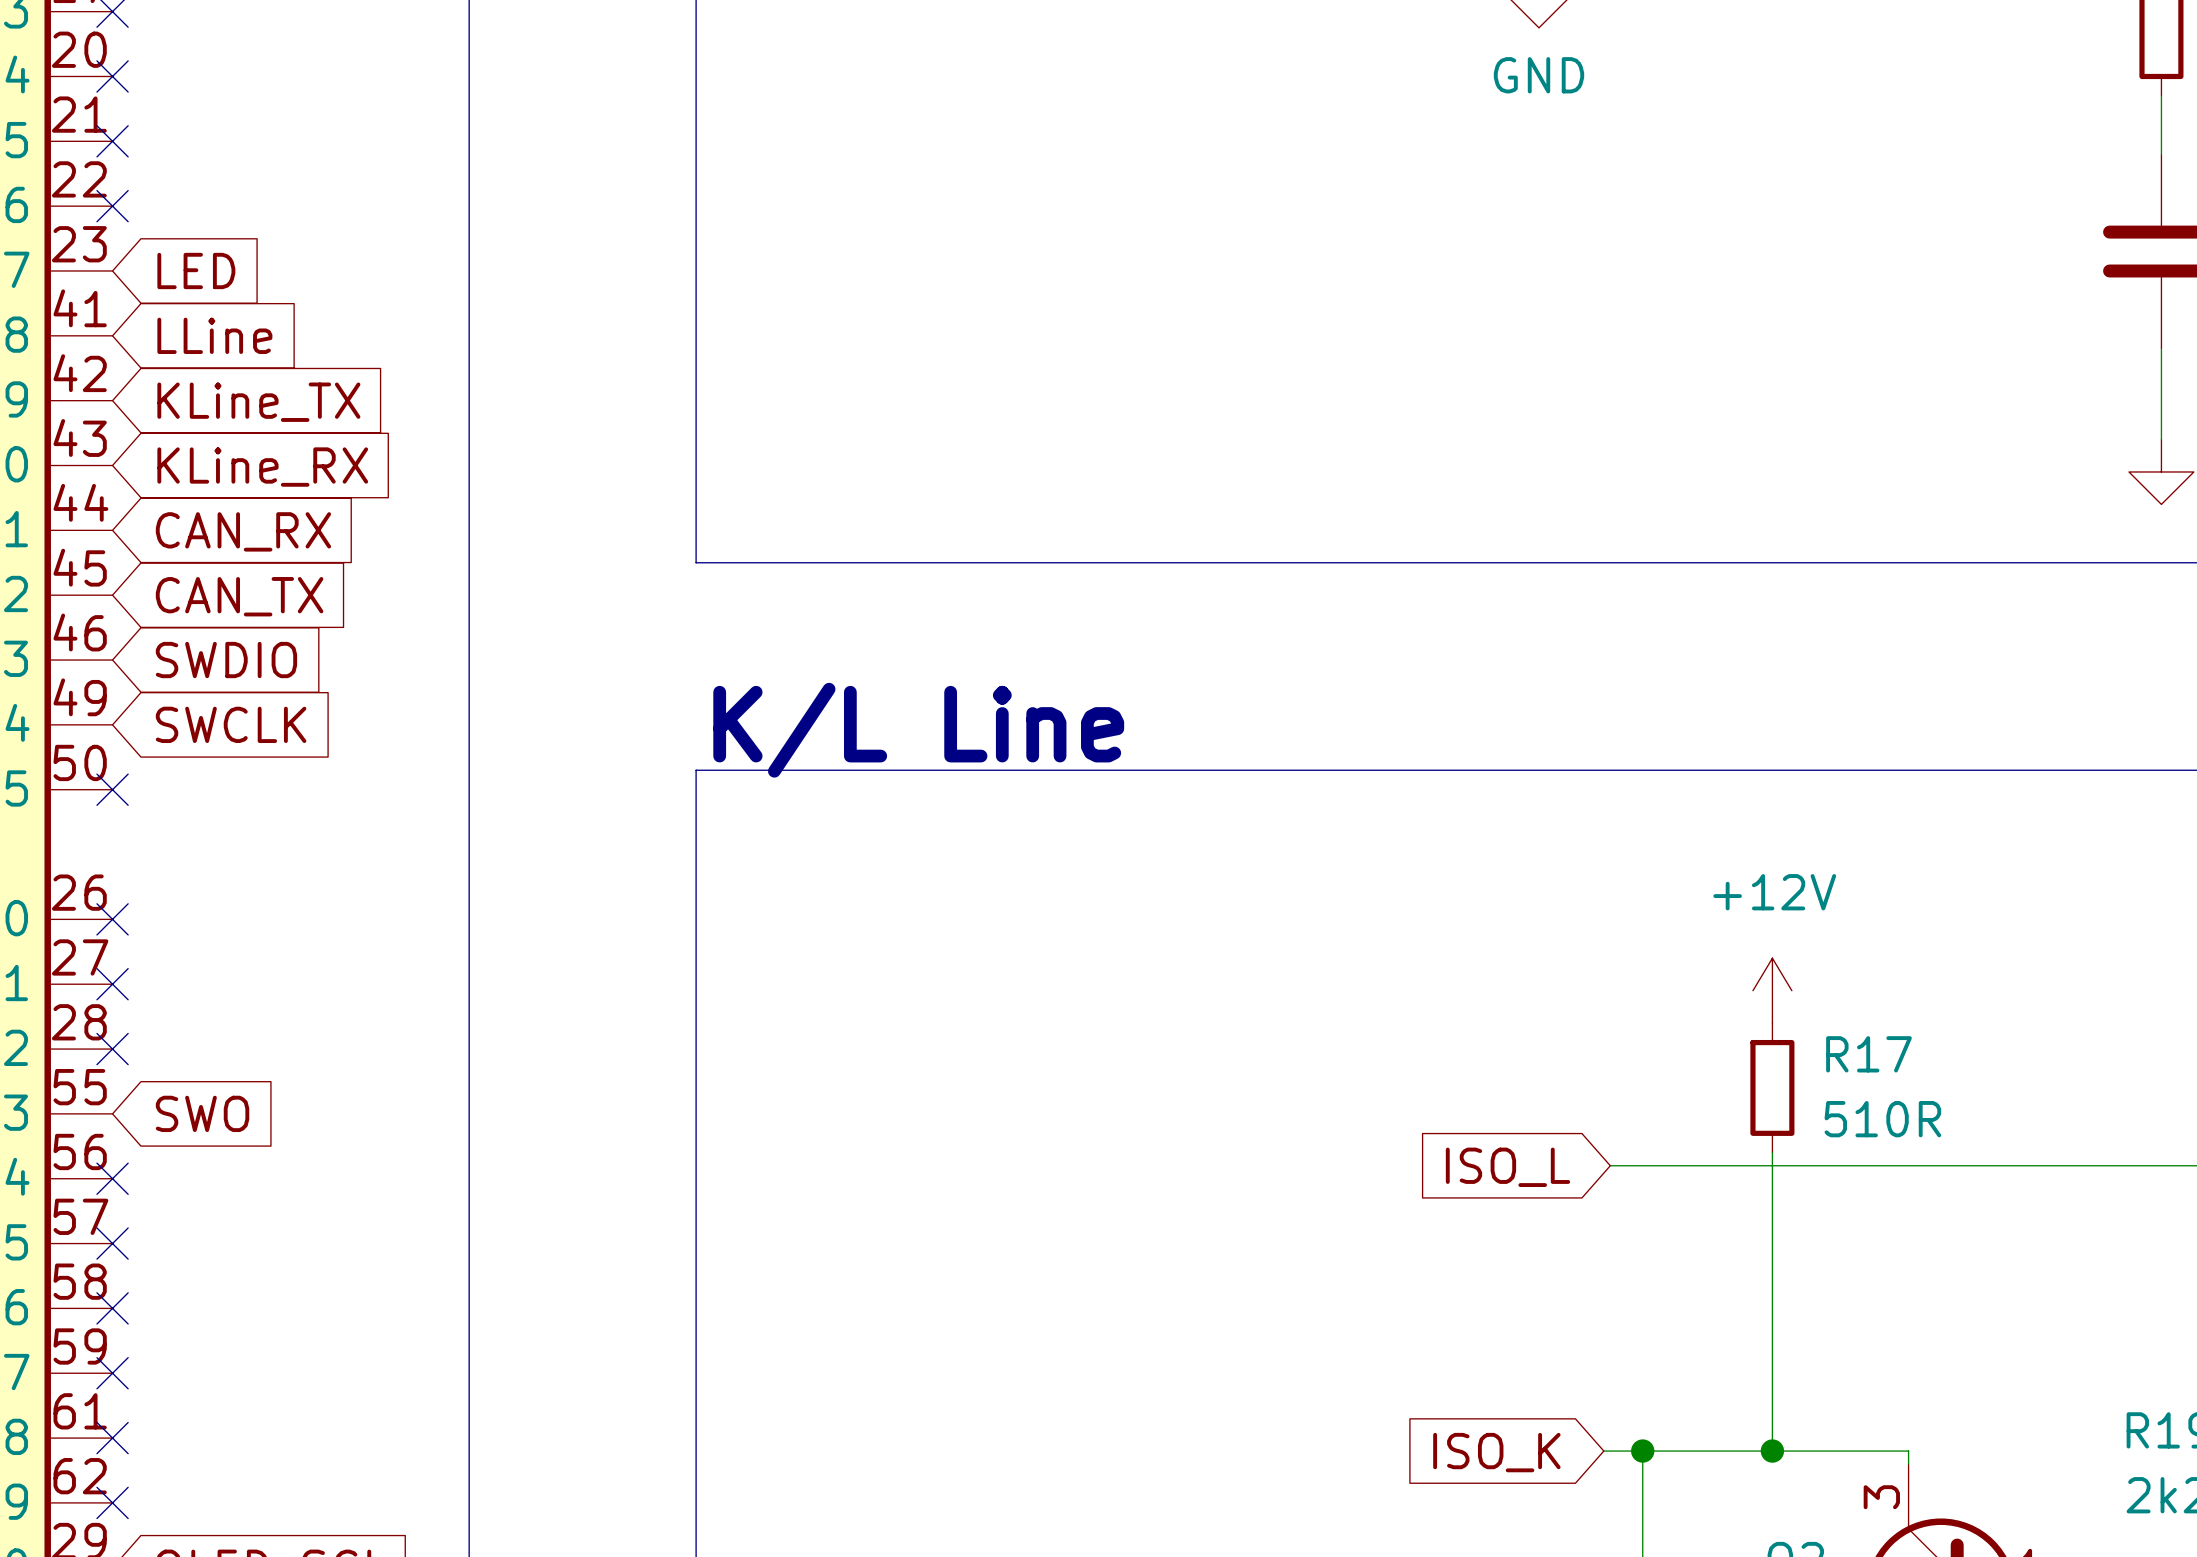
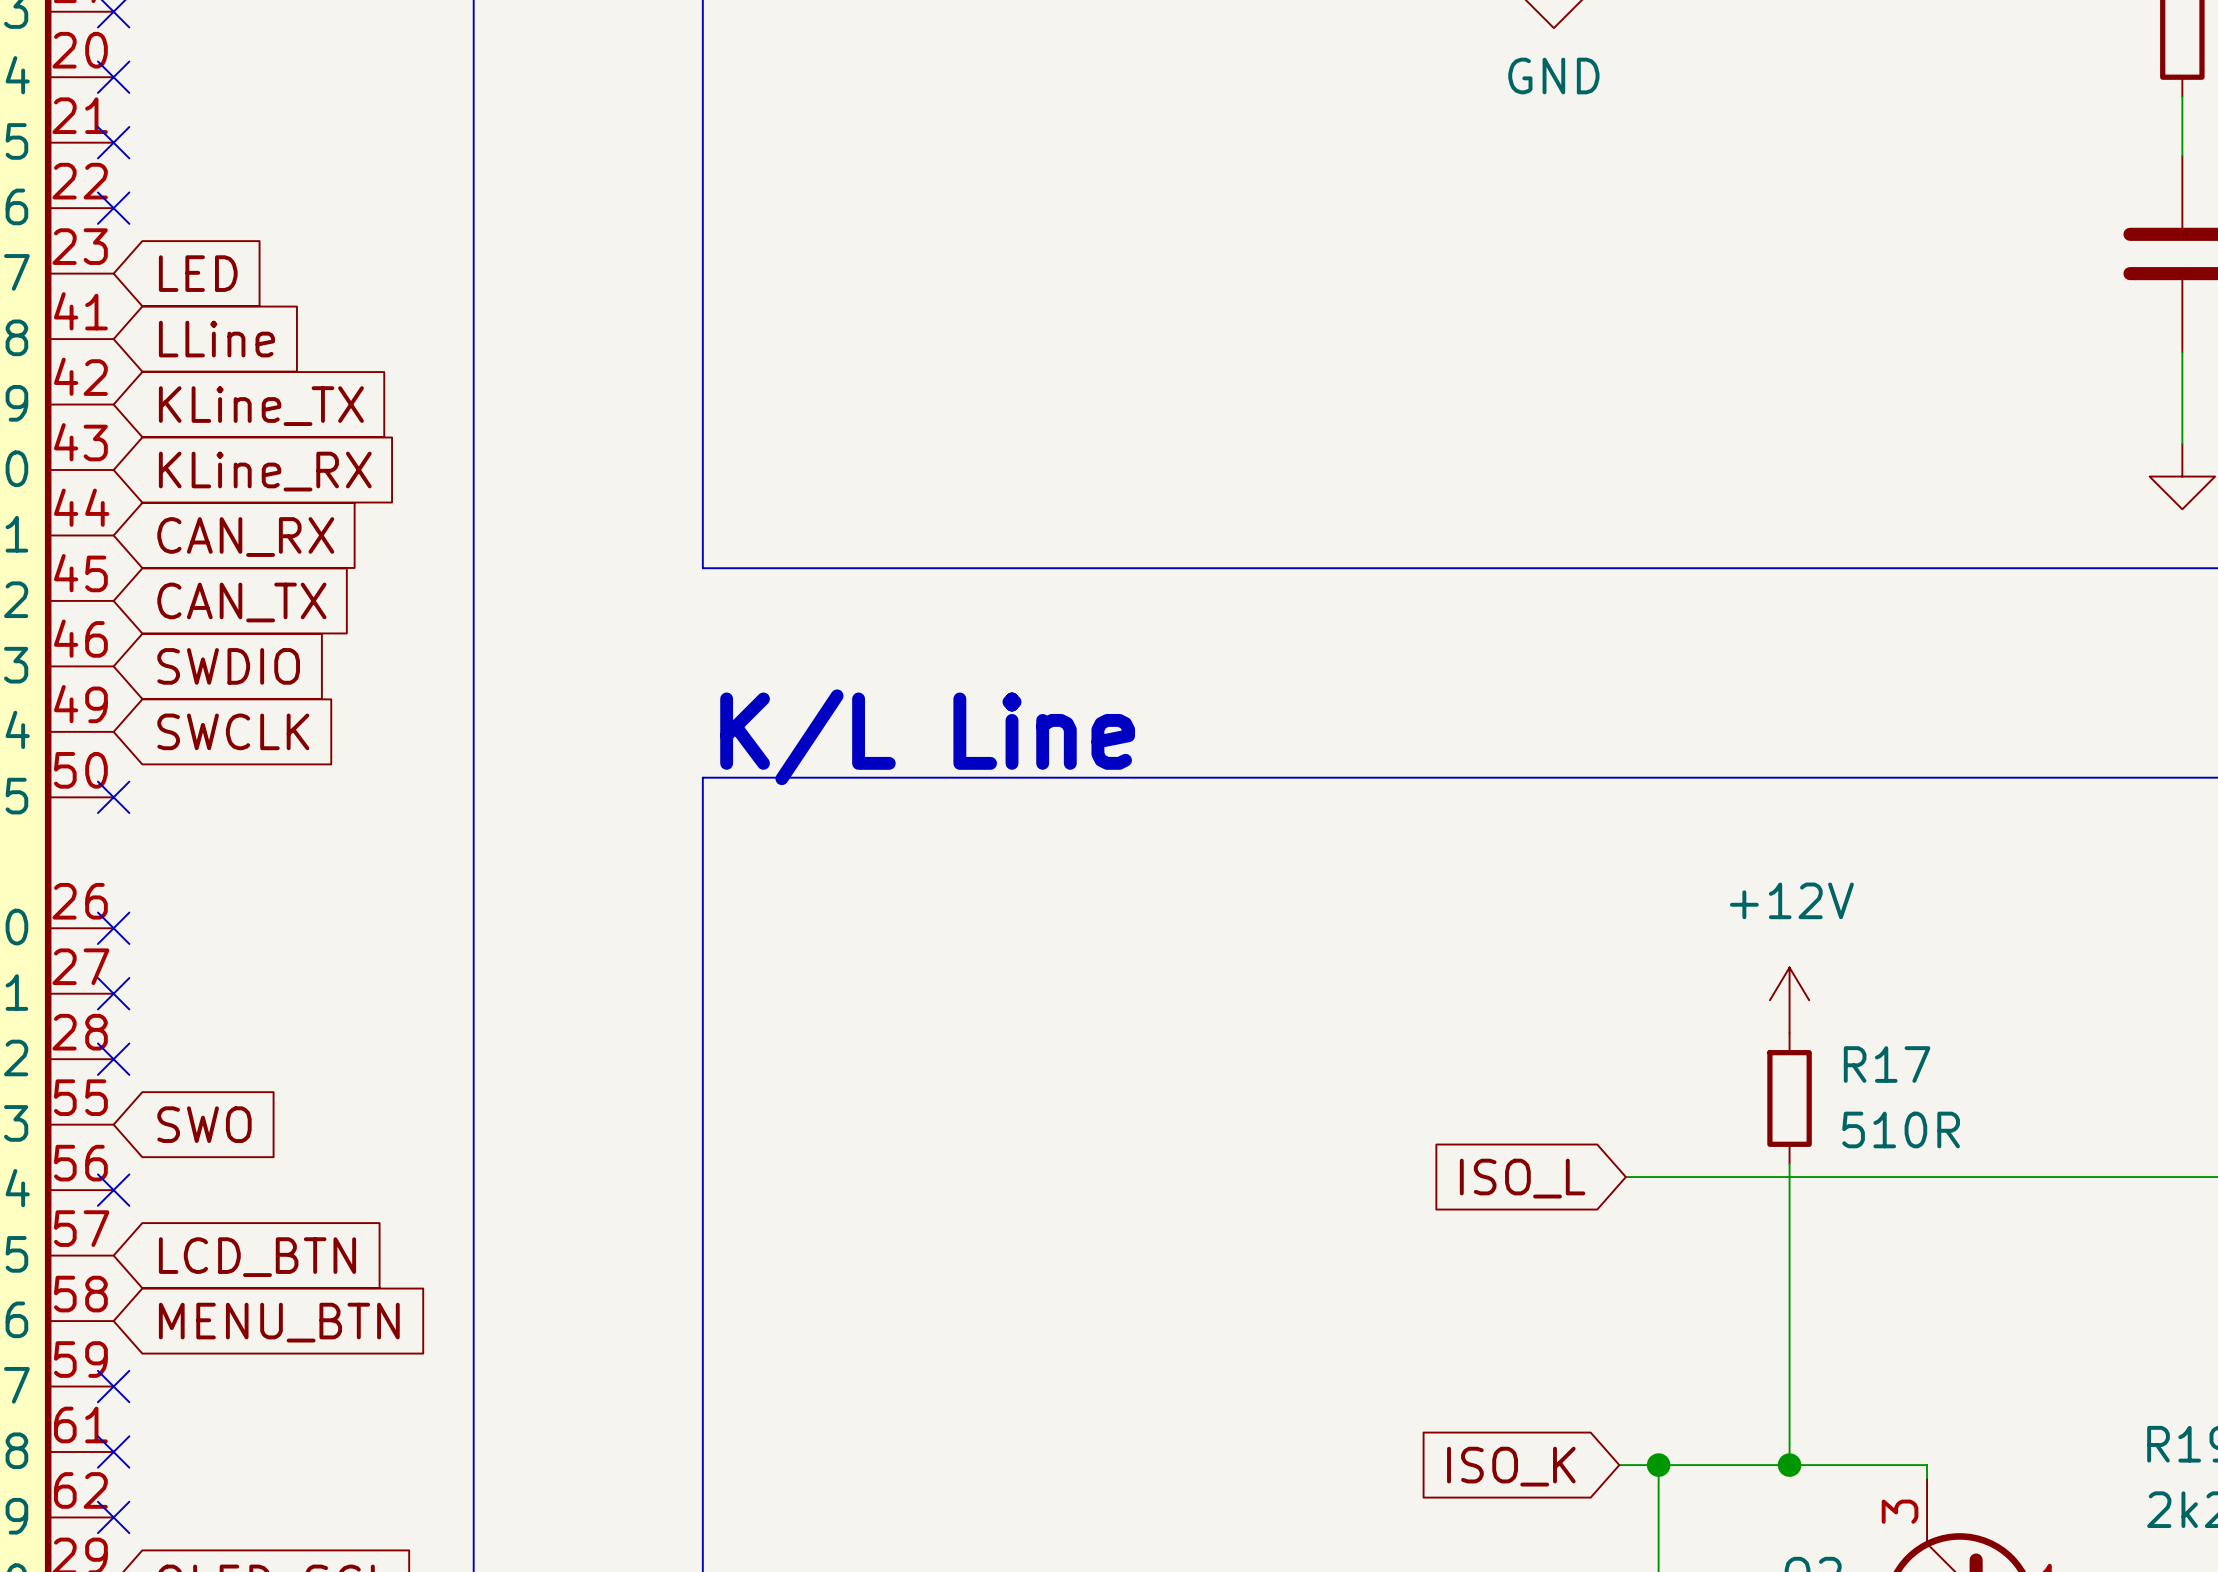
no-connect mark: (112, 1243) -> none
global label: none -> LCD_BTN (257, 1257)
no-connect mark: (112, 1308) -> none
global label: none -> MENU_BTN (279, 1322)

